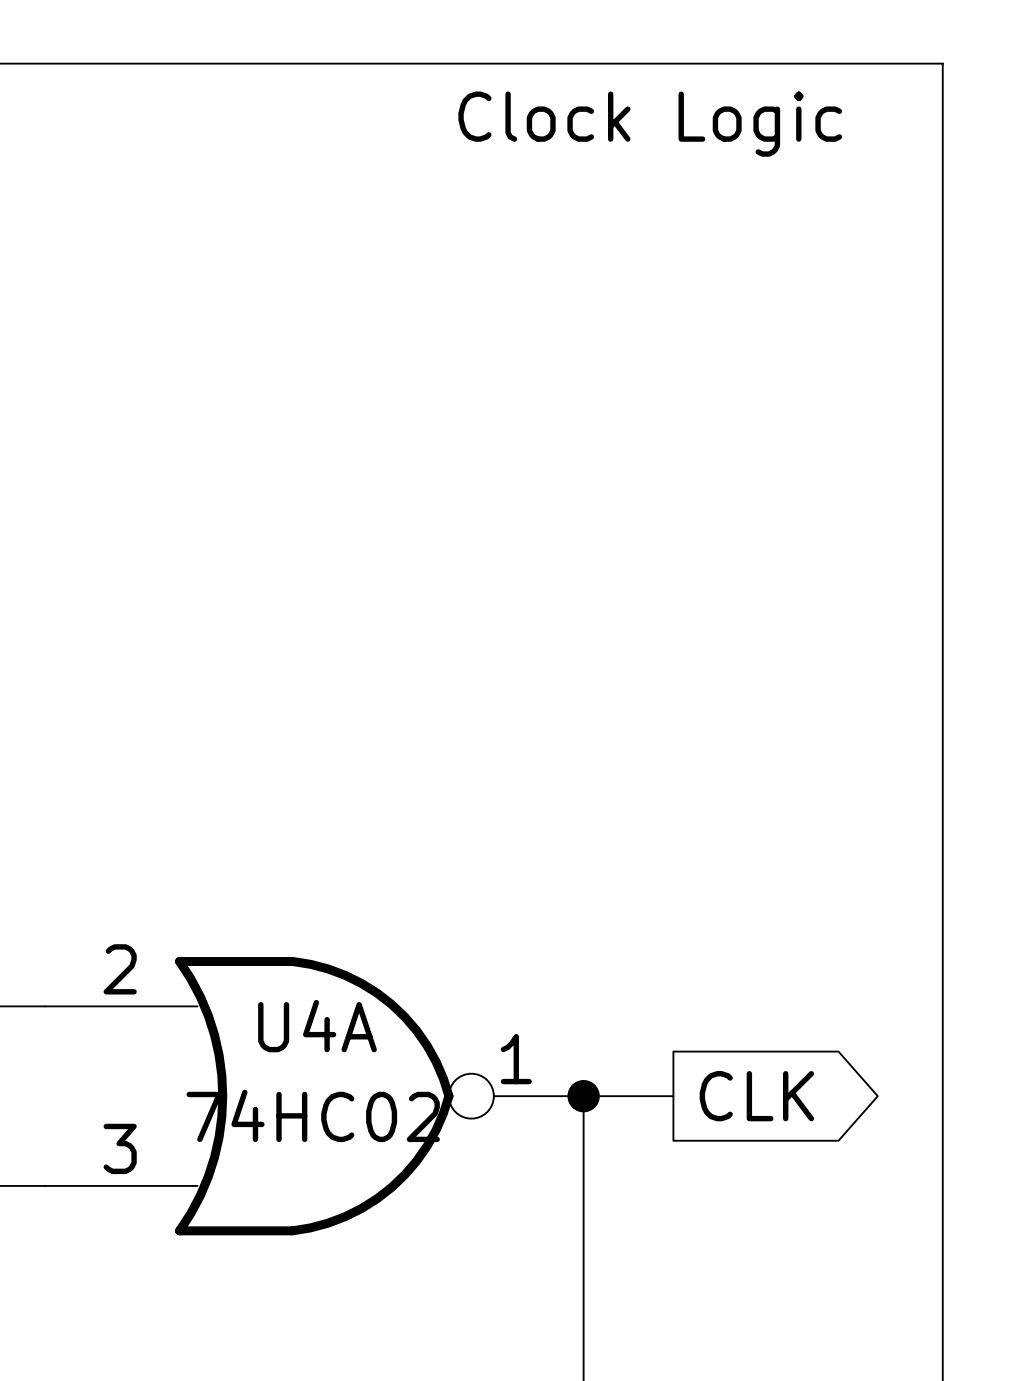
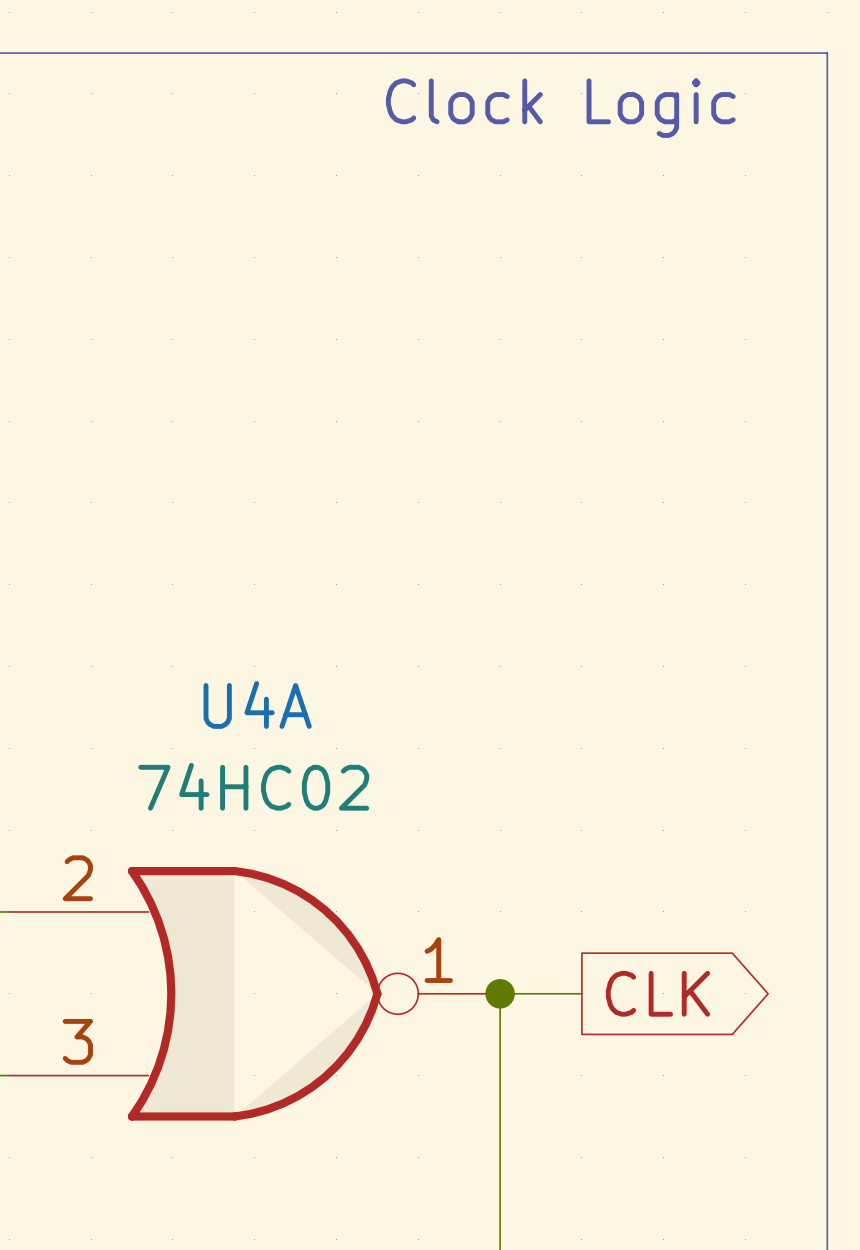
U4A name position: U4A (317, 1026) -> U4A (257, 704)
U4A value position: 74HC02 (313, 1115) -> 74HC02 (253, 786)

